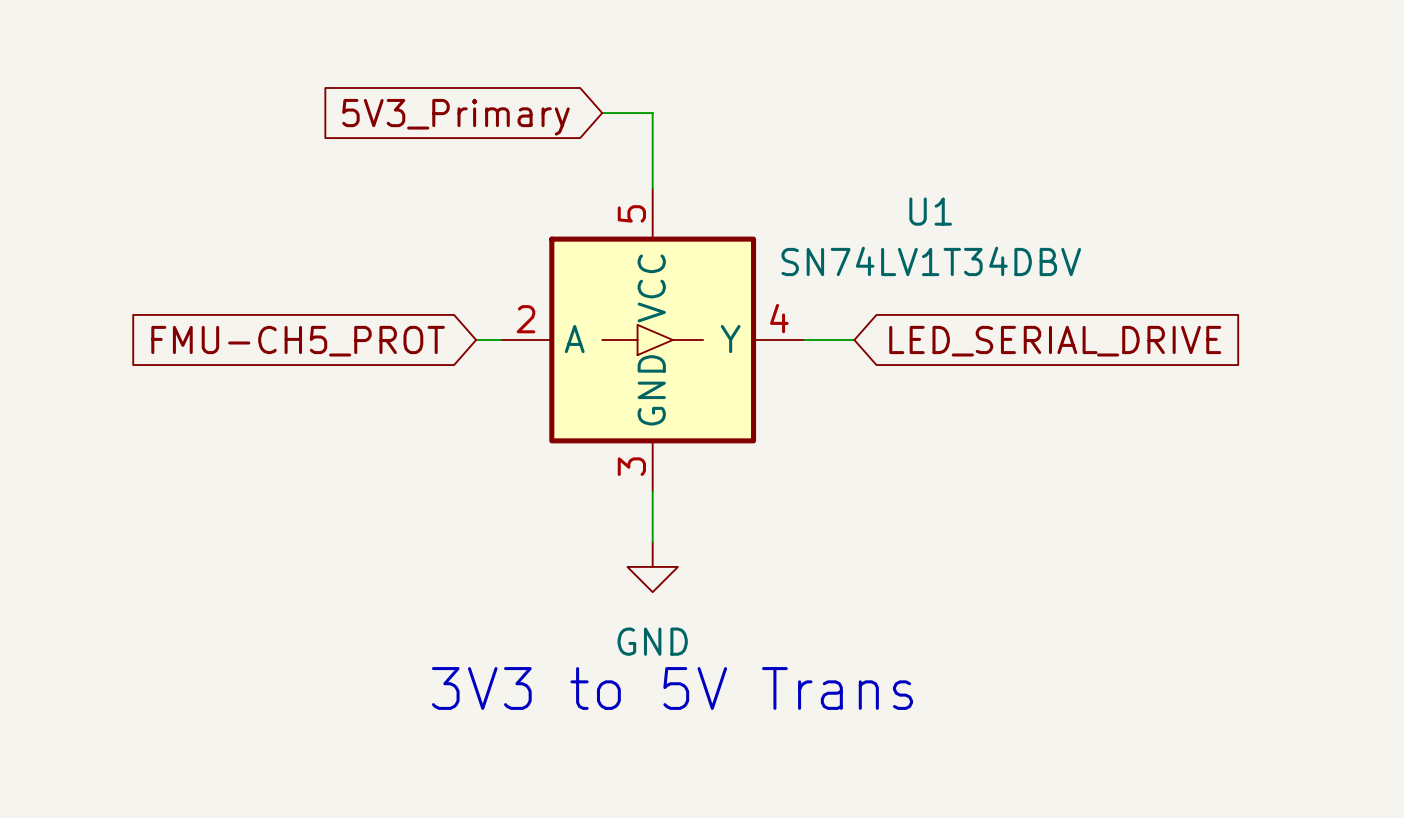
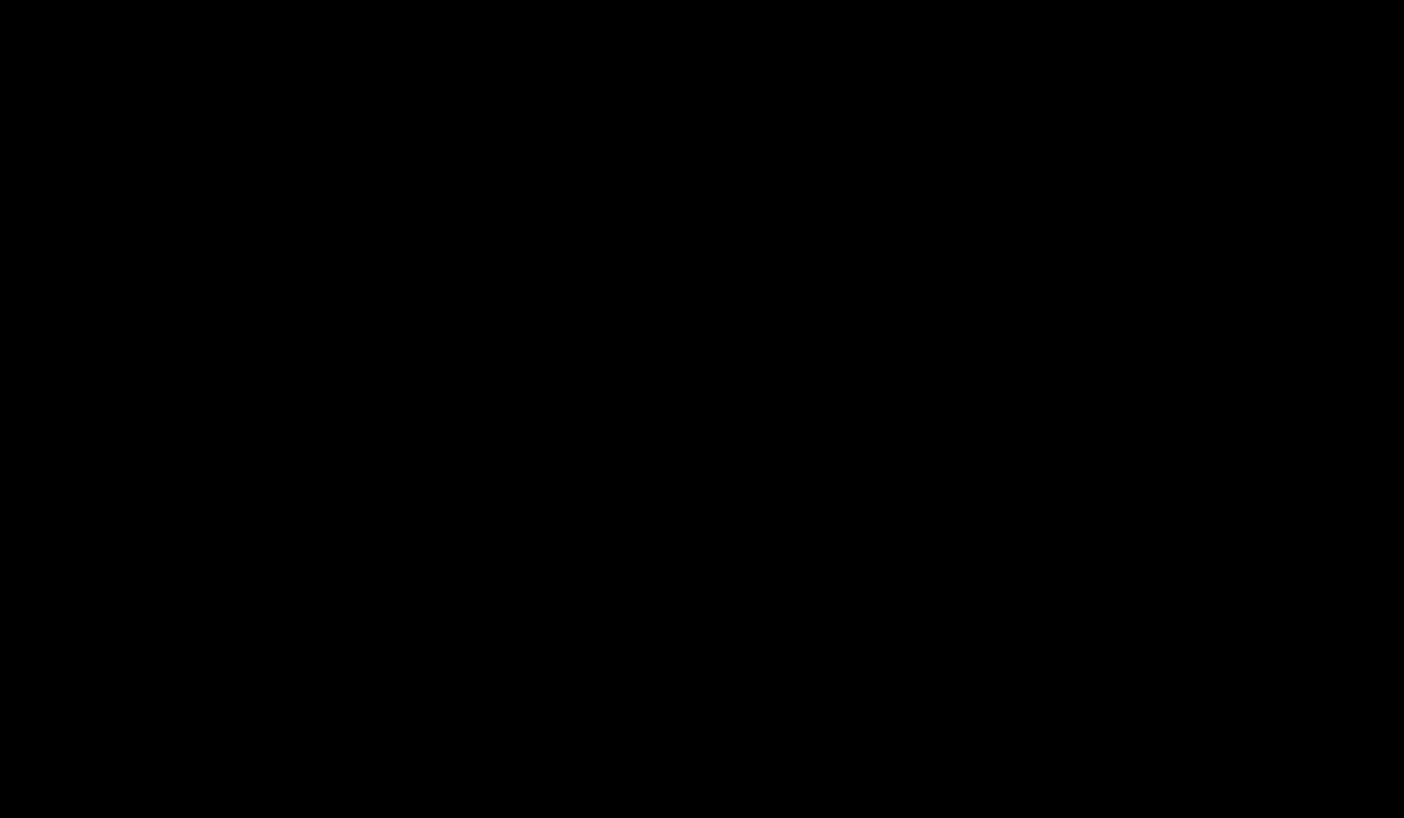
wire: (602, 113) (652, 113) (652, 188) -> none
global label: 5V3_Primary (456, 117) -> none
wire: (476, 339) (501, 339) -> none
U1: SN74LV1T34DBV (652, 339) -> none
wire: (803, 339) (854, 339) -> none
global label: FMU-CH5_PROT (298, 341) -> none
global label: LED_SERIAL_DRIVE (1055, 341) -> none
wire: (652, 491) (652, 541) -> none
power symbol: GND (652, 566) -> none
text: 3V3 to 5V Trans (672, 688) -> none

